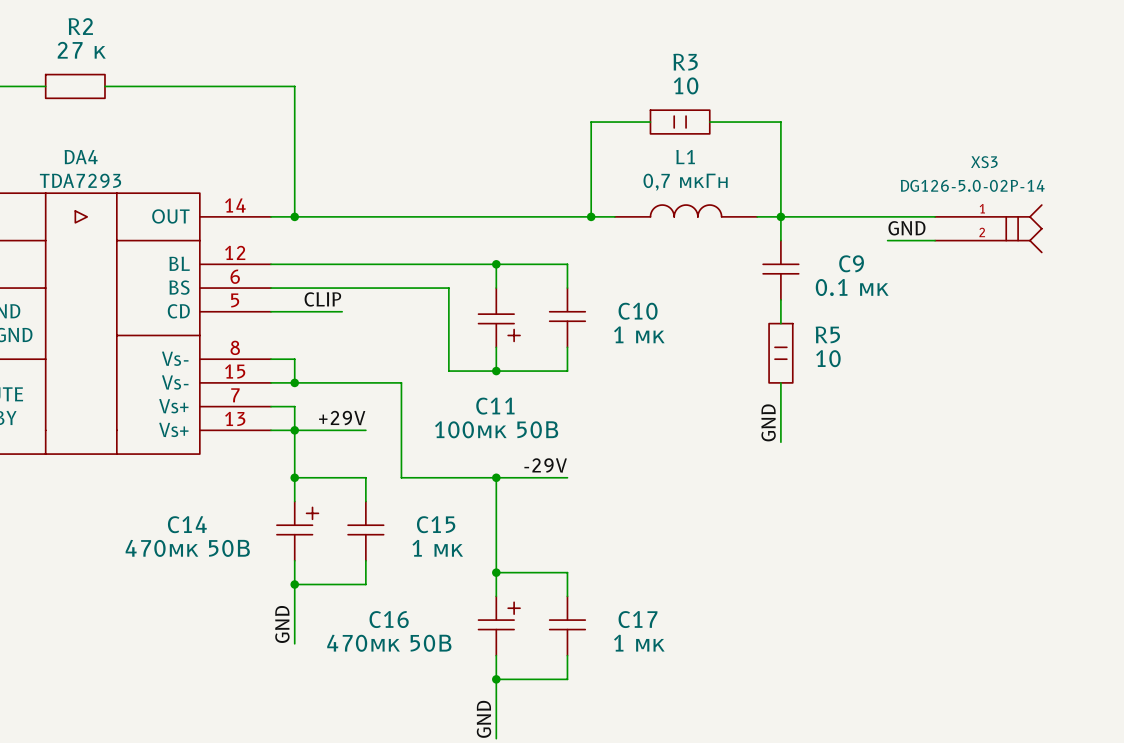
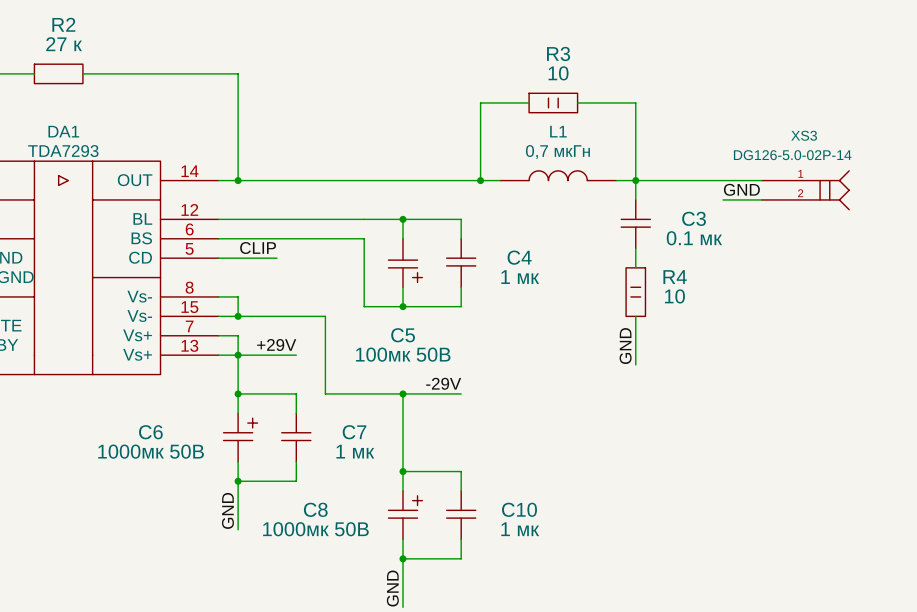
DA4 name: DA4 (81, 157) -> DA1 (63, 131)
C9 name: C9 (851, 263) -> C3 (694, 218)
C10 name: C10 (638, 311) -> C4 (519, 257)
R5 name: R5 (827, 334) -> R4 (675, 277)
C11 name: C11 (495, 406) -> C5 (403, 335)
C14 name: C14 (187, 524) -> C6 (150, 432)
C15 name: C15 (436, 524) -> C7 (354, 432)
C14 value: 470мк 50В (187, 548) -> 1000мк 50В (151, 451)
C16 name: C16 (389, 619) -> C8 (315, 509)
C17 name: C17 (638, 619) -> C10 (519, 509)
C16 value: 470мк 50В (389, 643) -> 1000мк 50В (315, 529)

